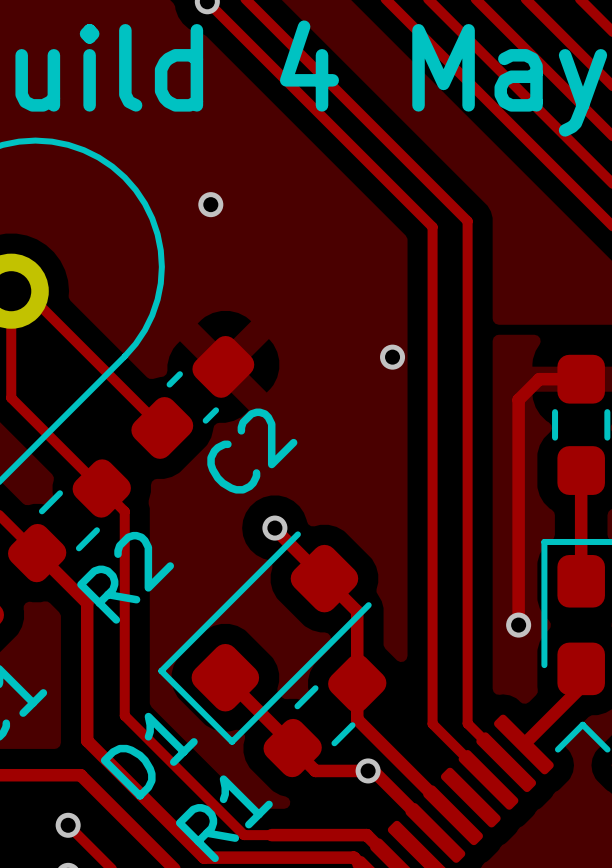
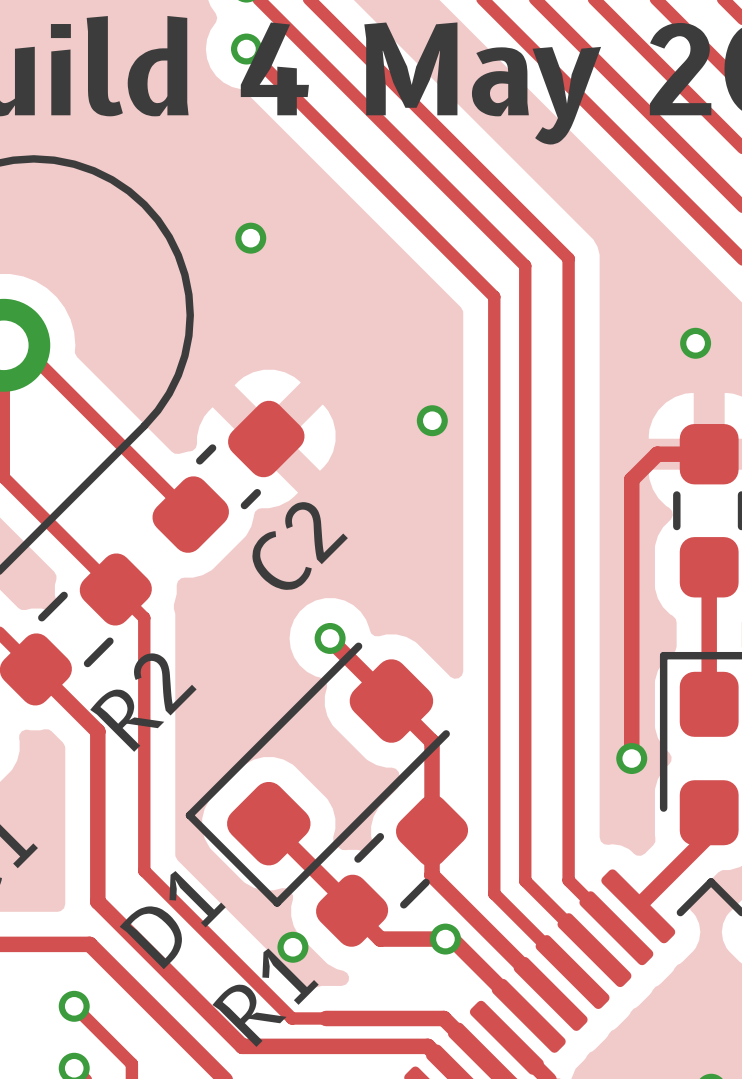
track: none -> (246, 49) (494, 296) (494, 893) (572, 972)
via: none -> (246, 49)
via: none -> (695, 343)
via position: (392, 357) -> (432, 420)
via: none -> (292, 947)

